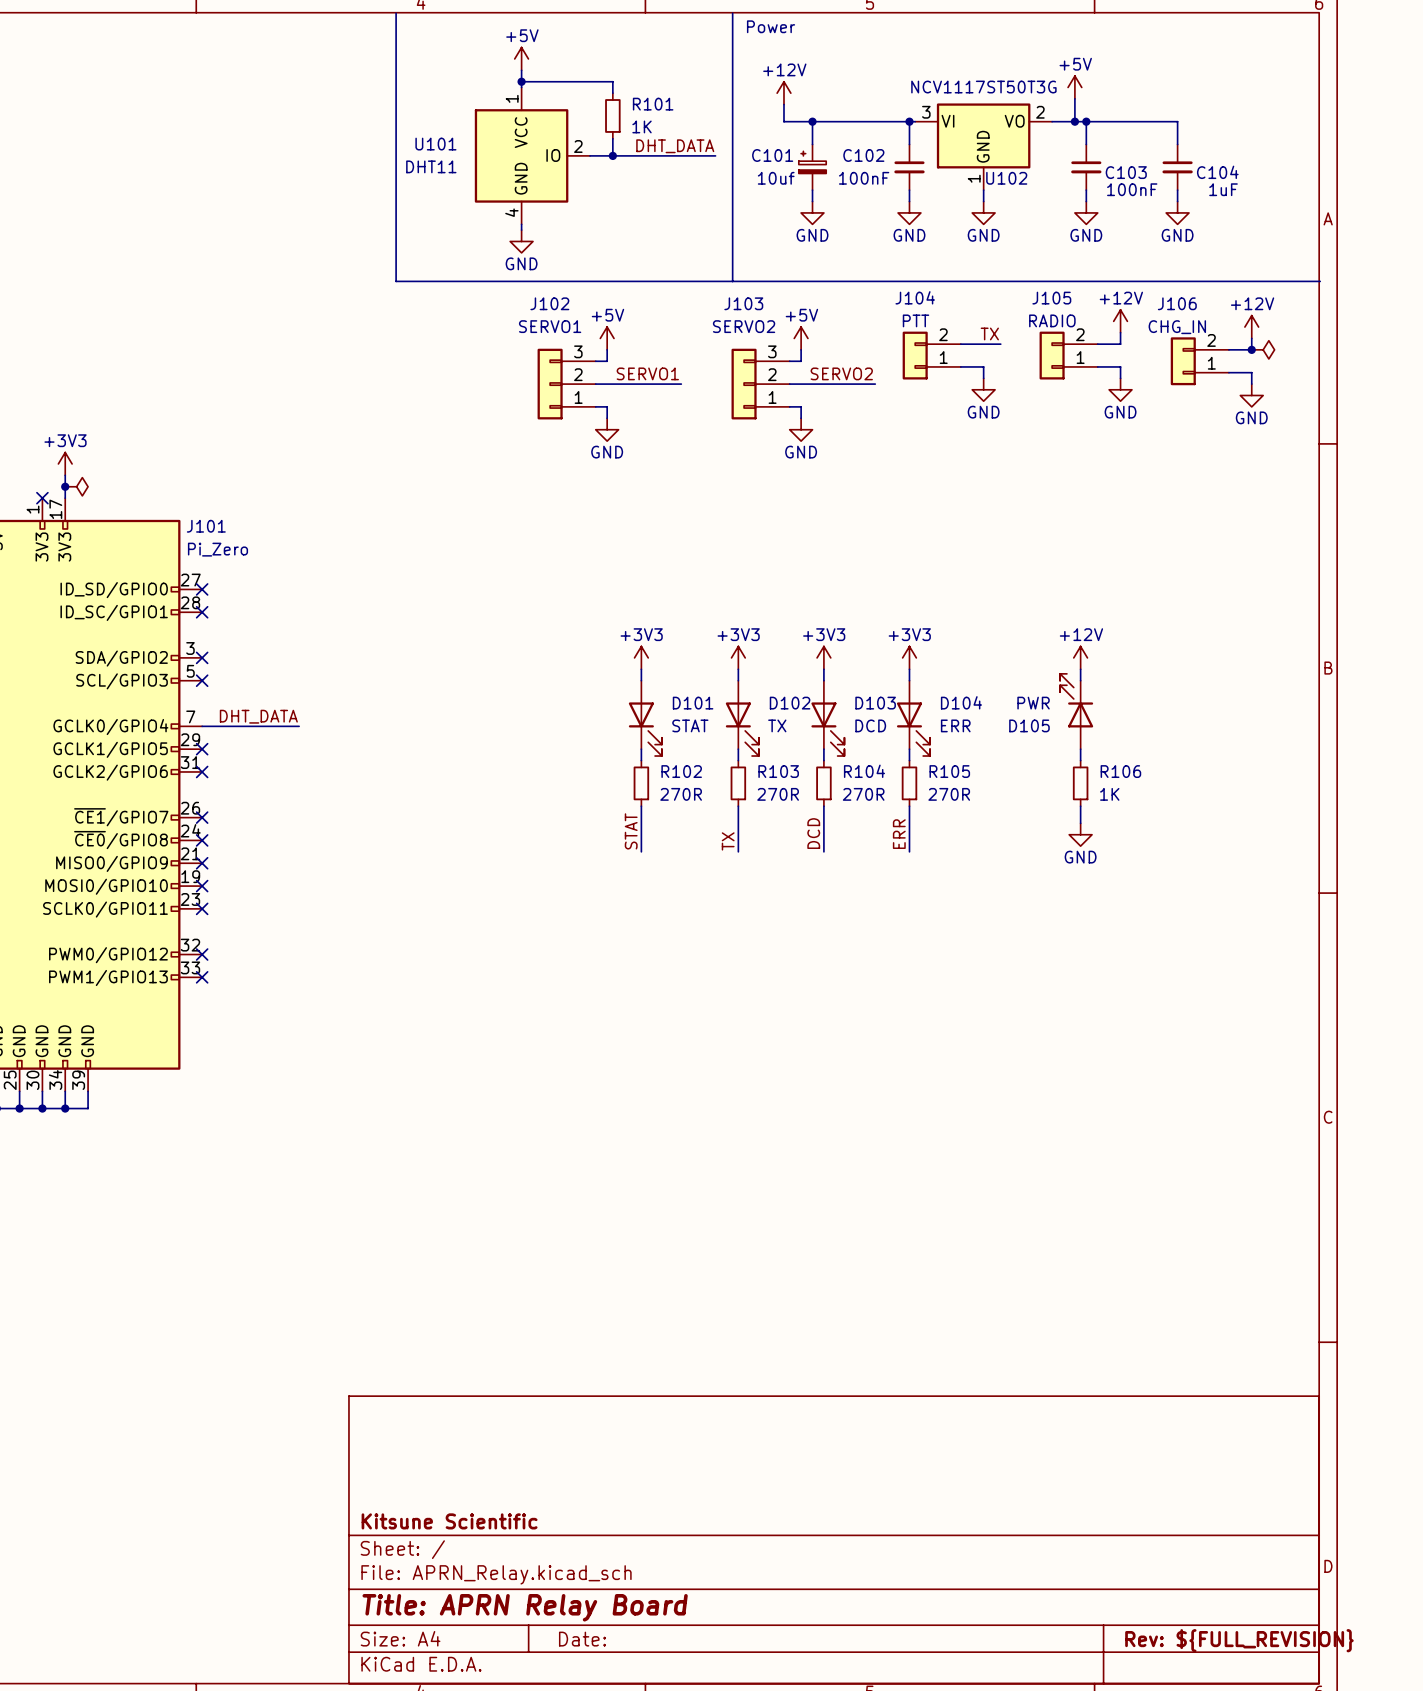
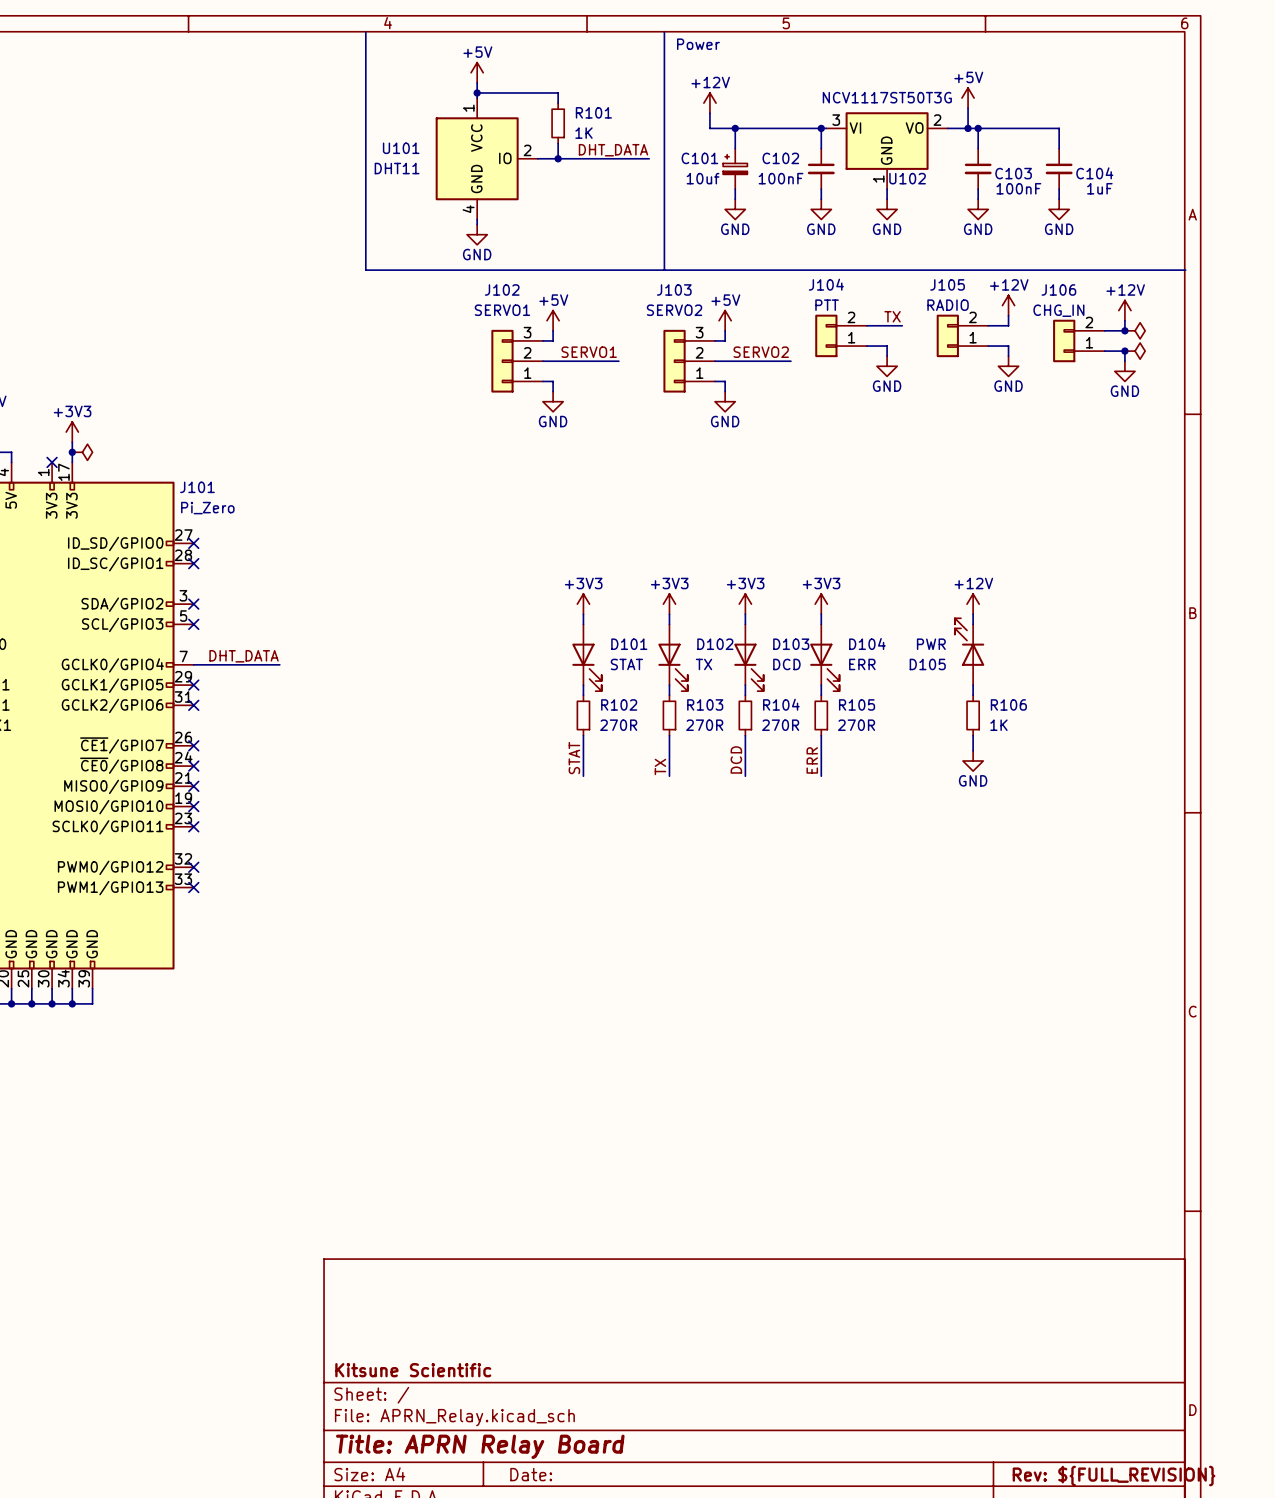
junction: none -> (1124, 351)
power symbol: none -> (1135, 351)

